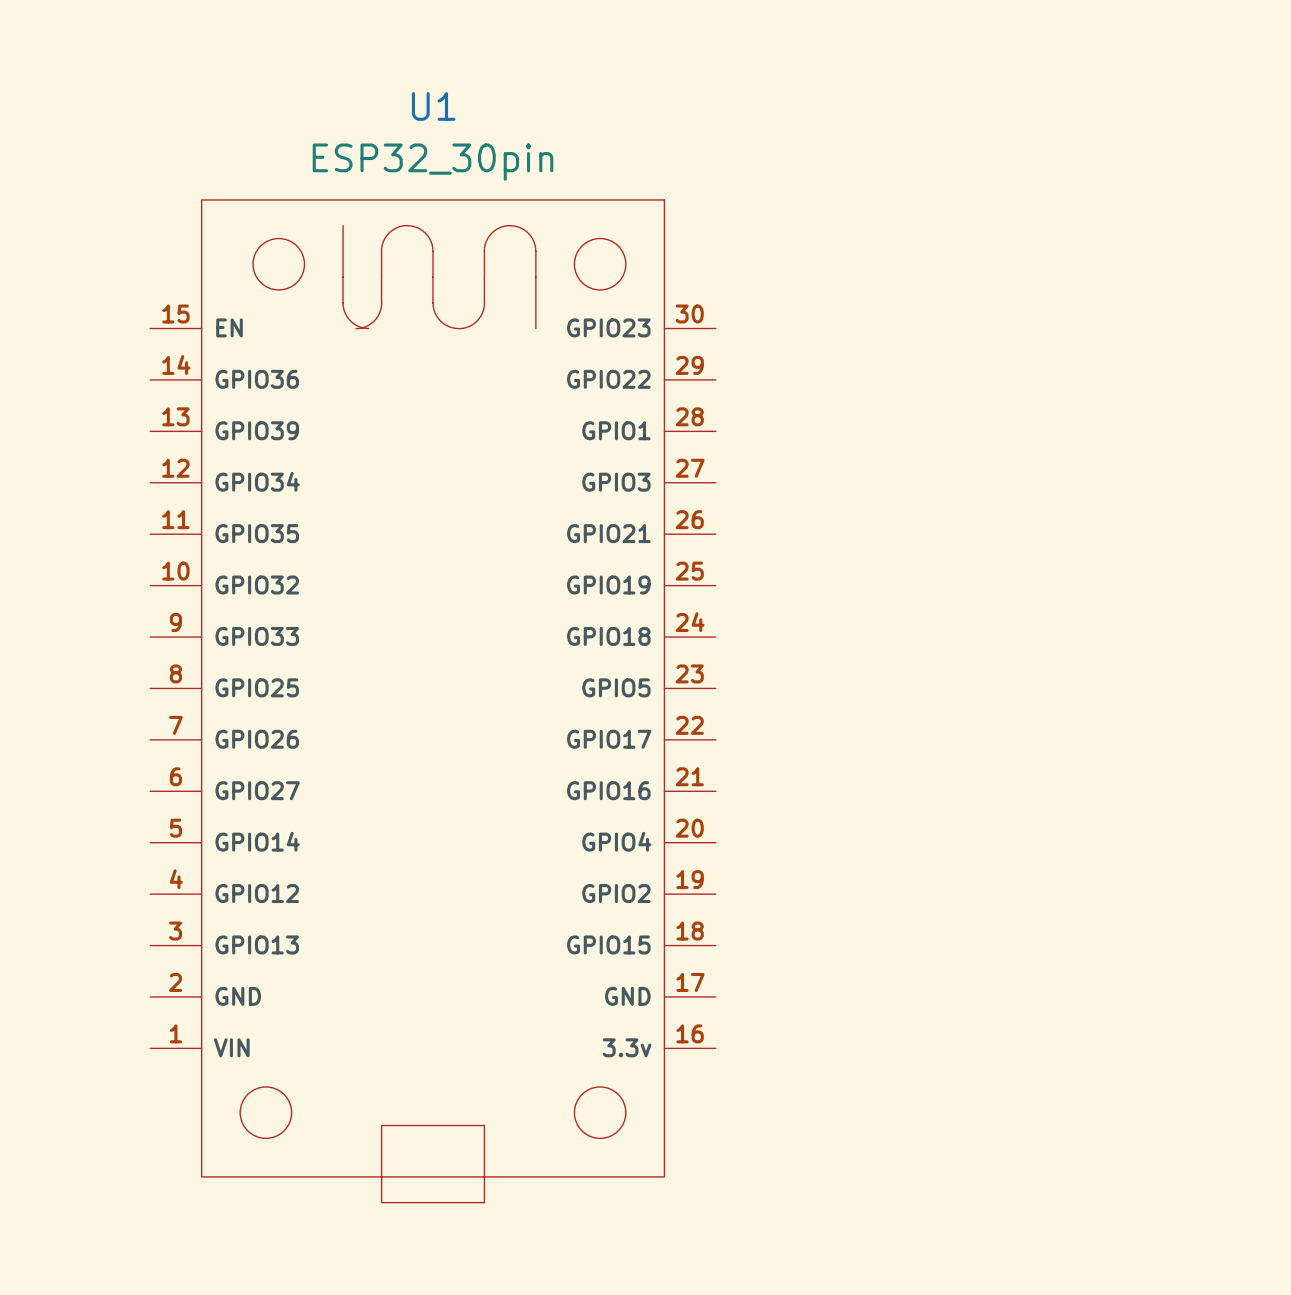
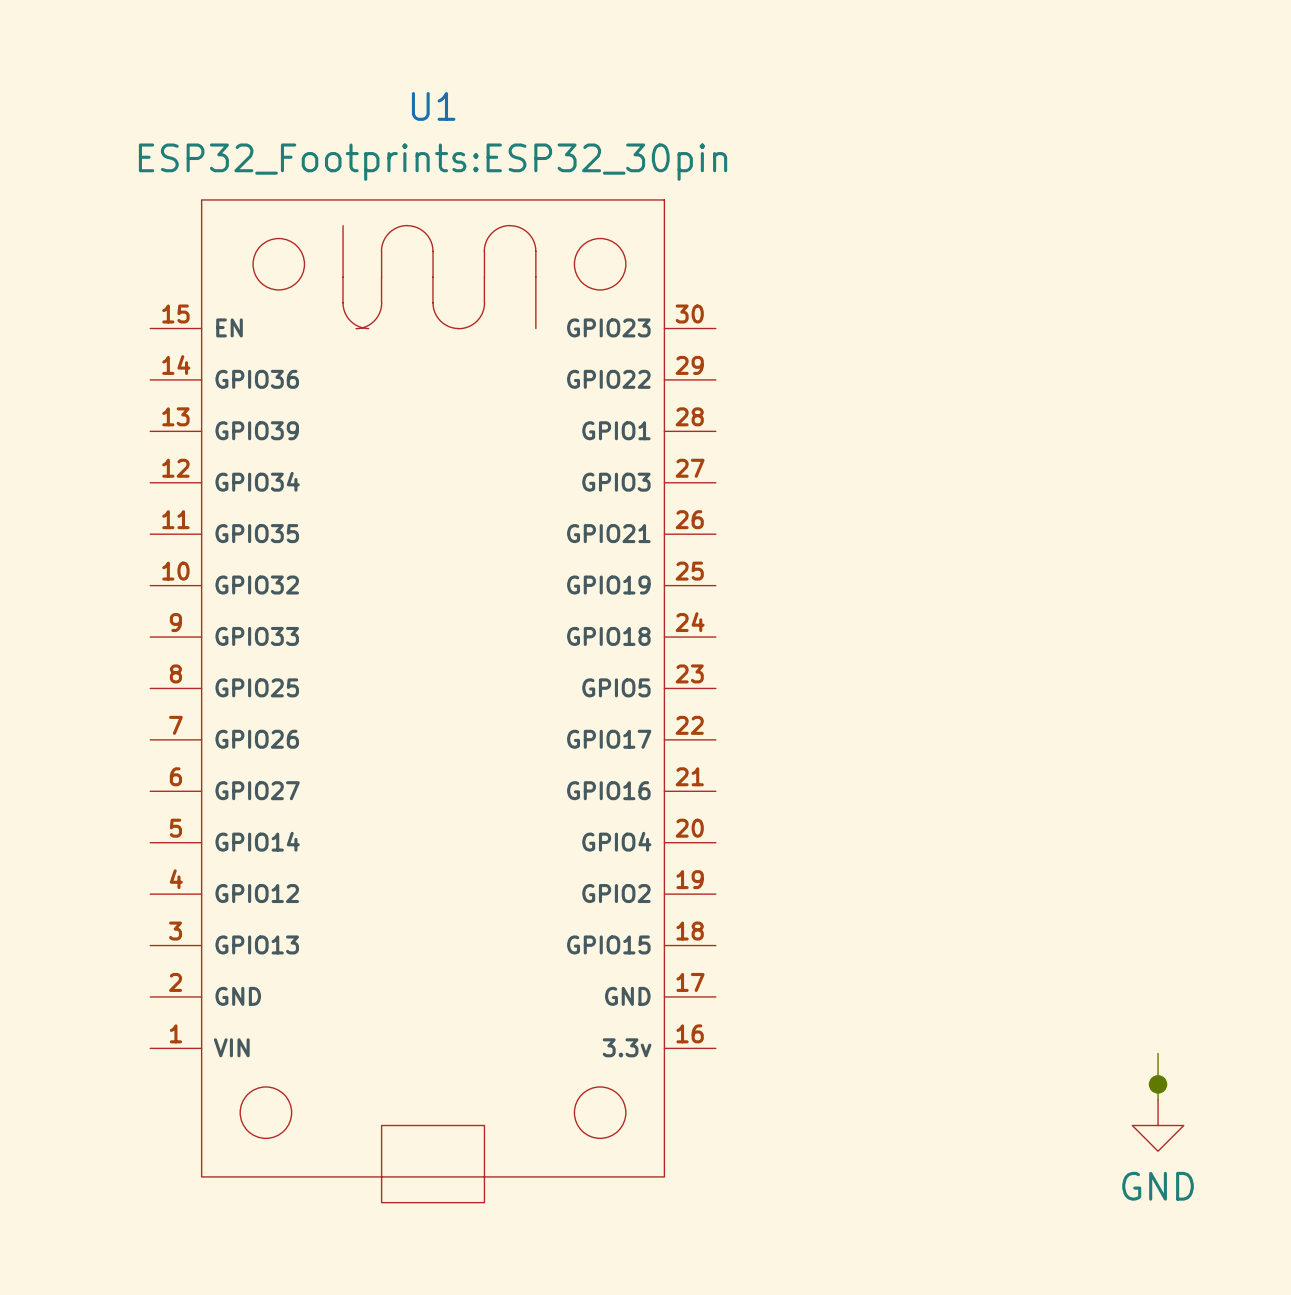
U1 text: ESP32_30pin (433, 162) -> ESP32_Footprints:ESP32_30pin (433, 162)
wire: none -> (1158, 1053) (1158, 1099)
junction: none -> (1158, 1084)
power symbol: none -> GND (1158, 1125)

